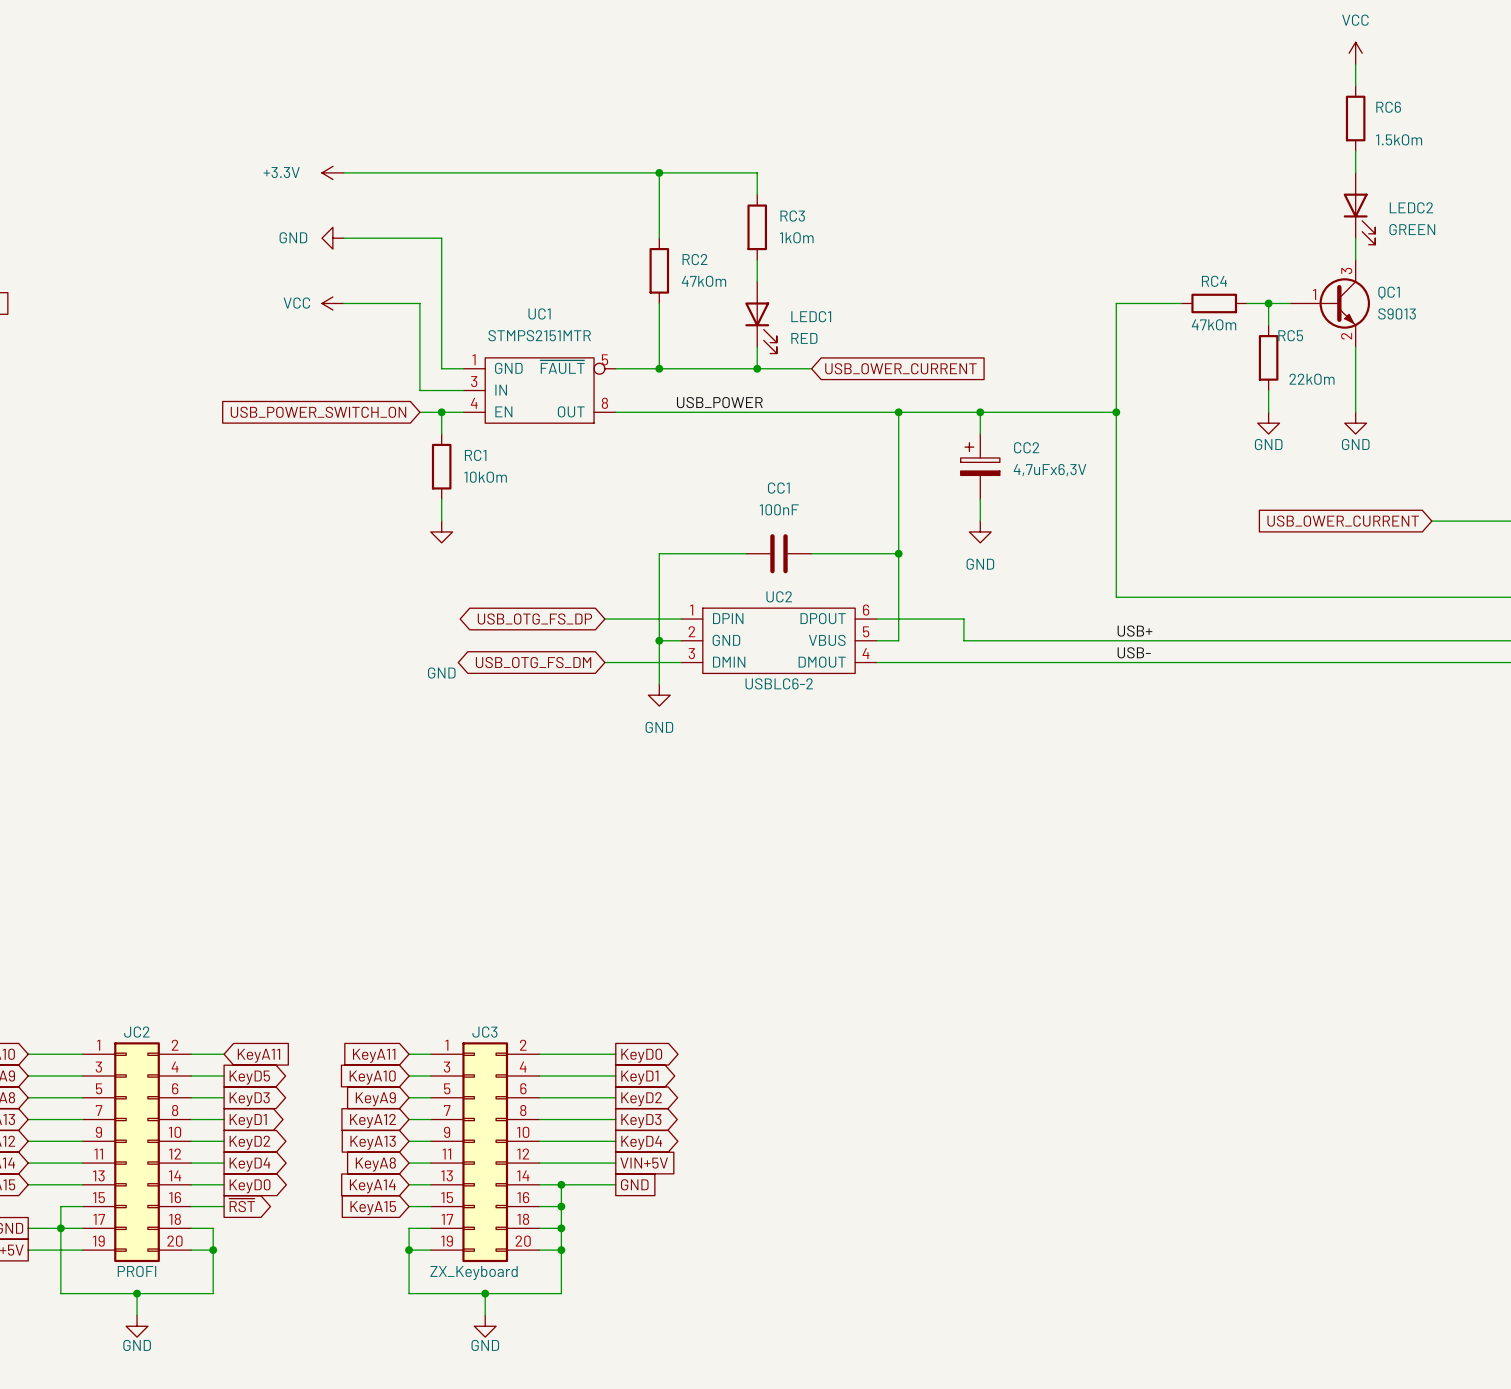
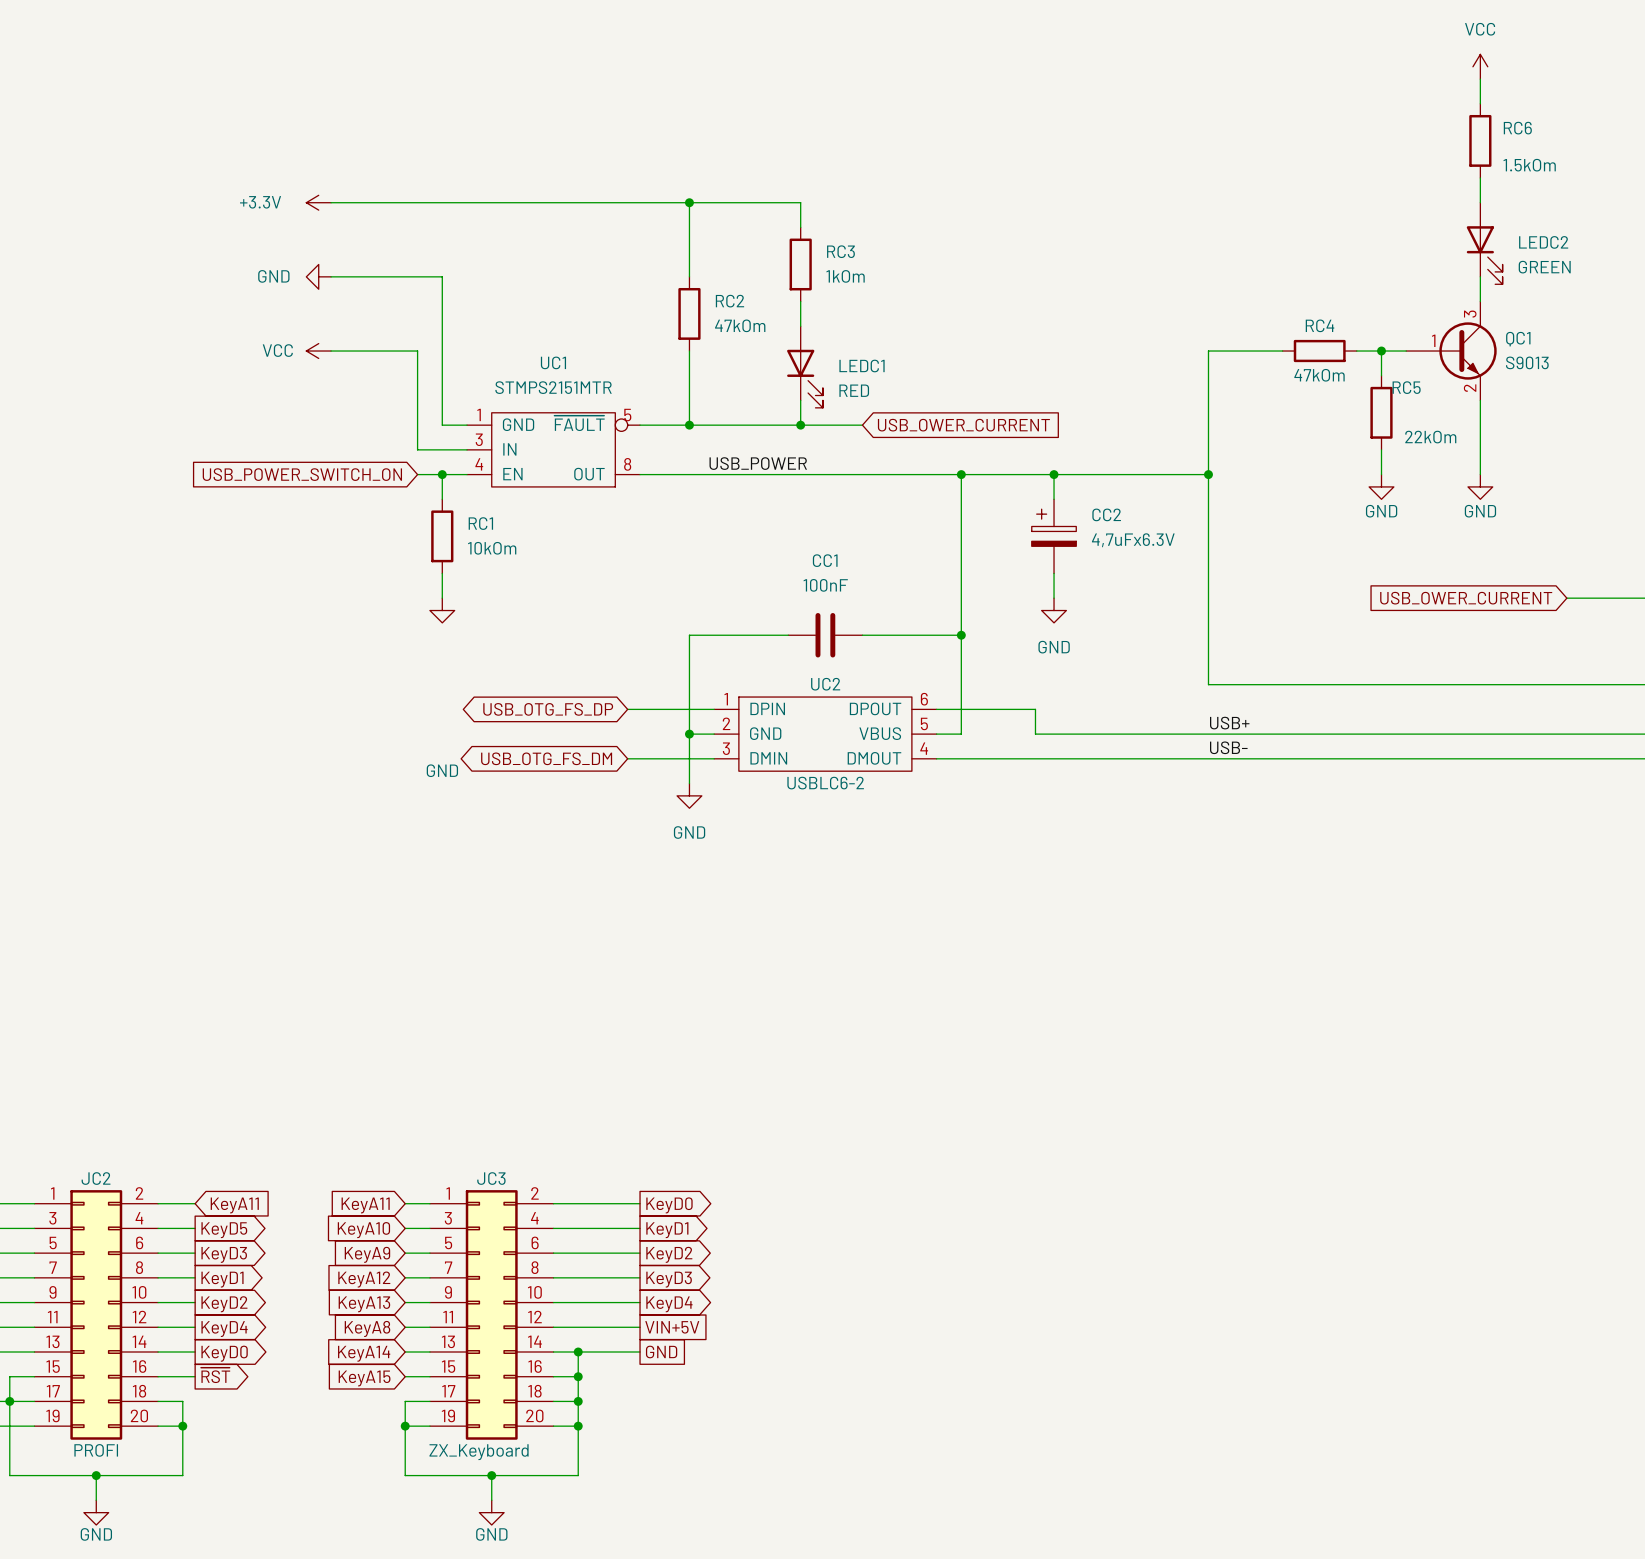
CC2 value: 4,7uFx6,3V (1049, 470) -> 4,7uFx6.3V (1133, 540)

